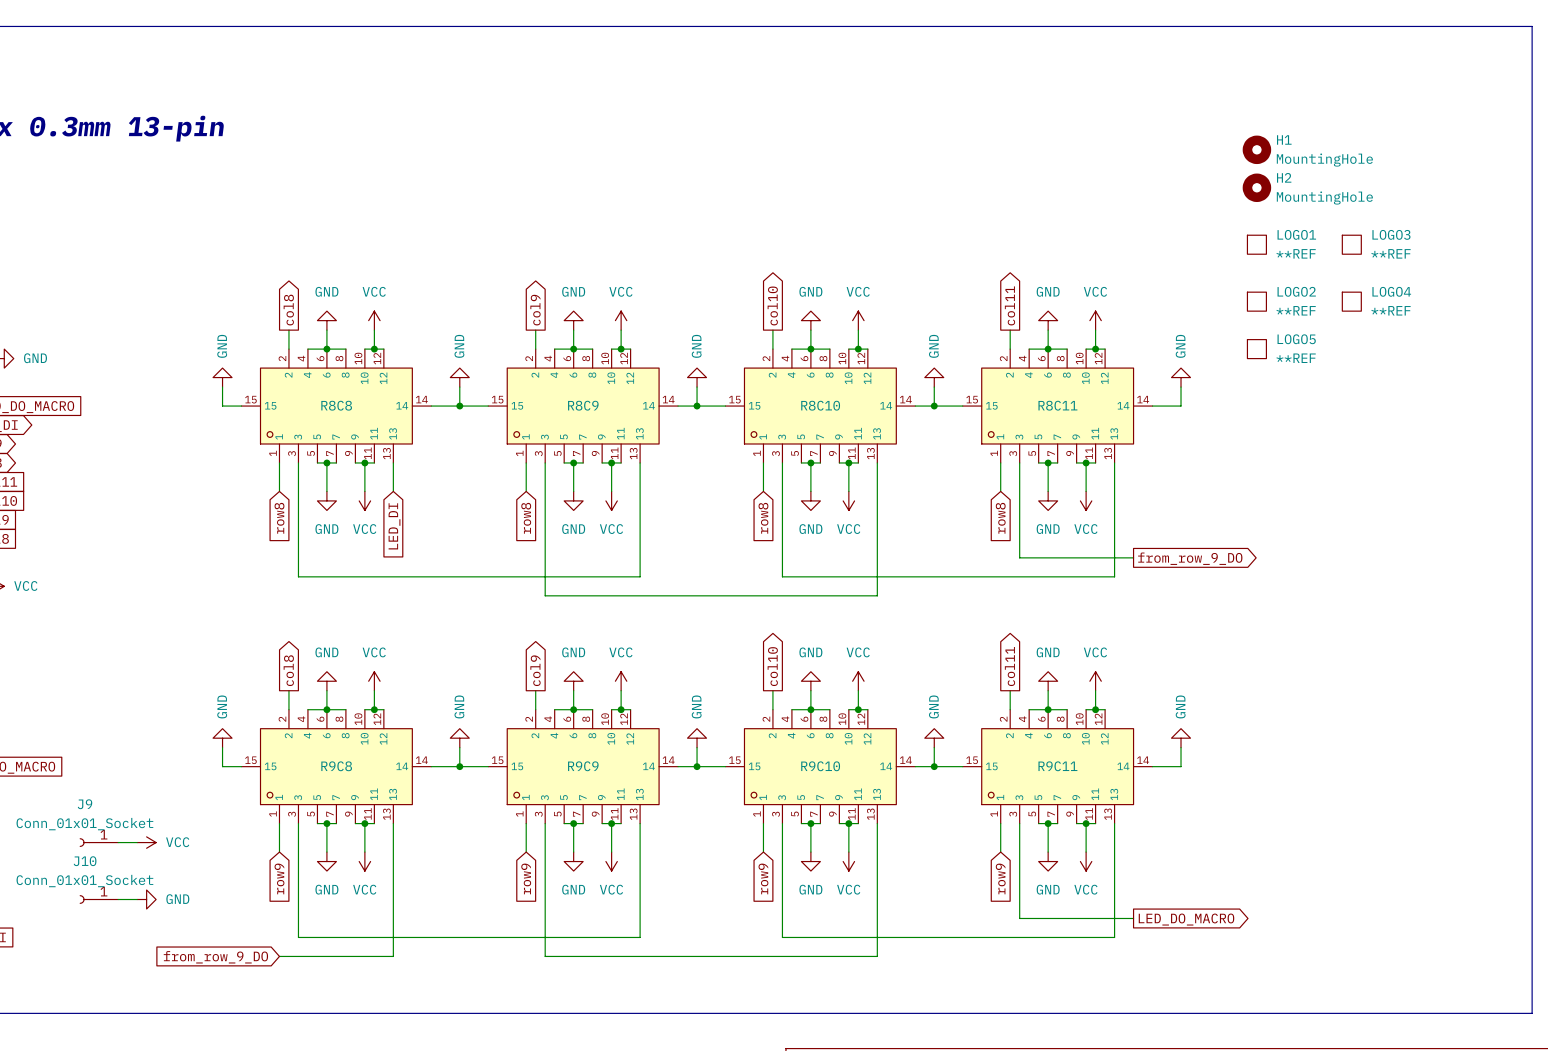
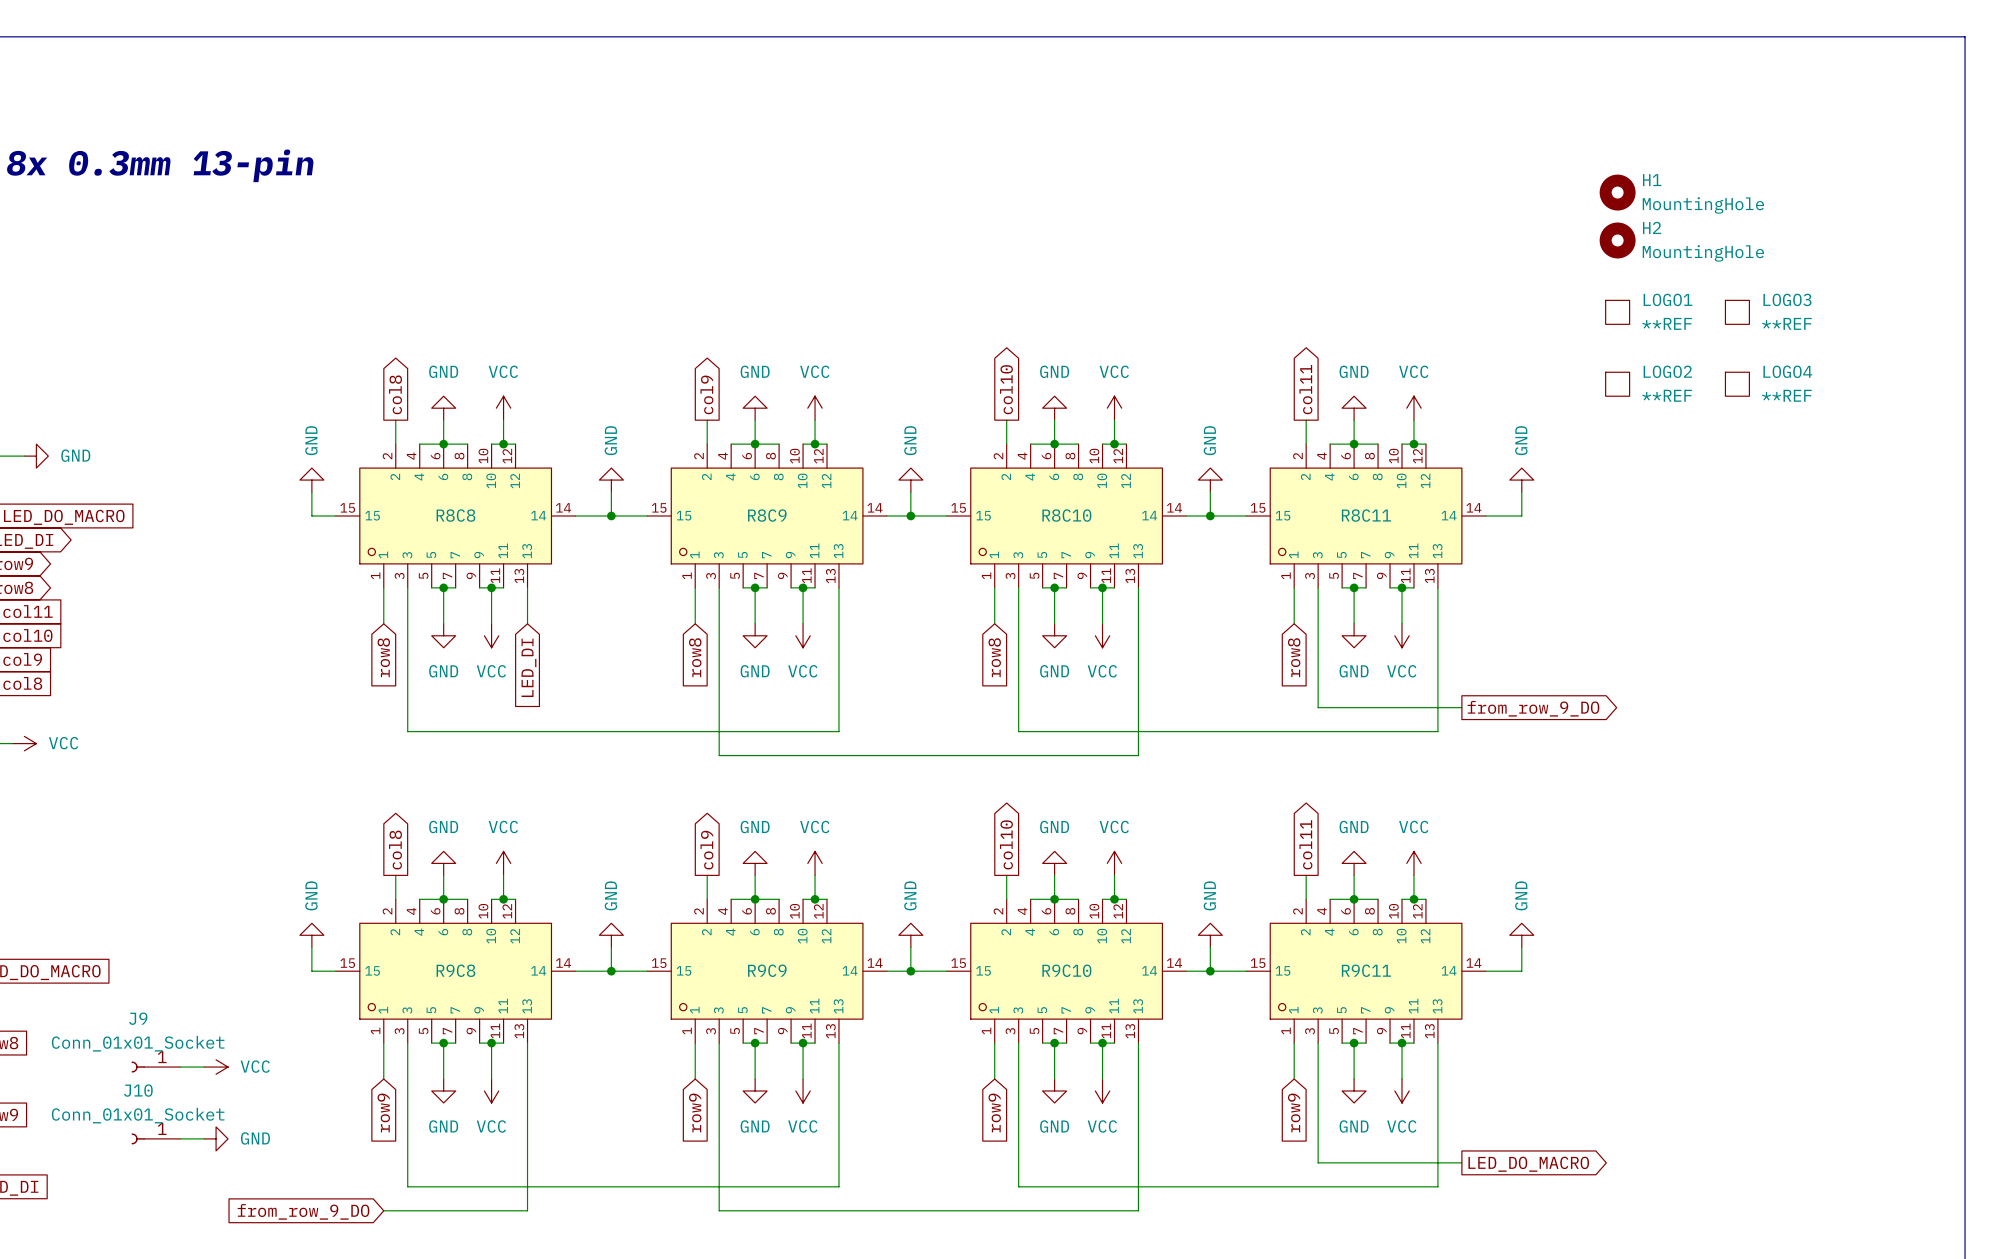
LOGO5: **REF (1256, 349) -> none

